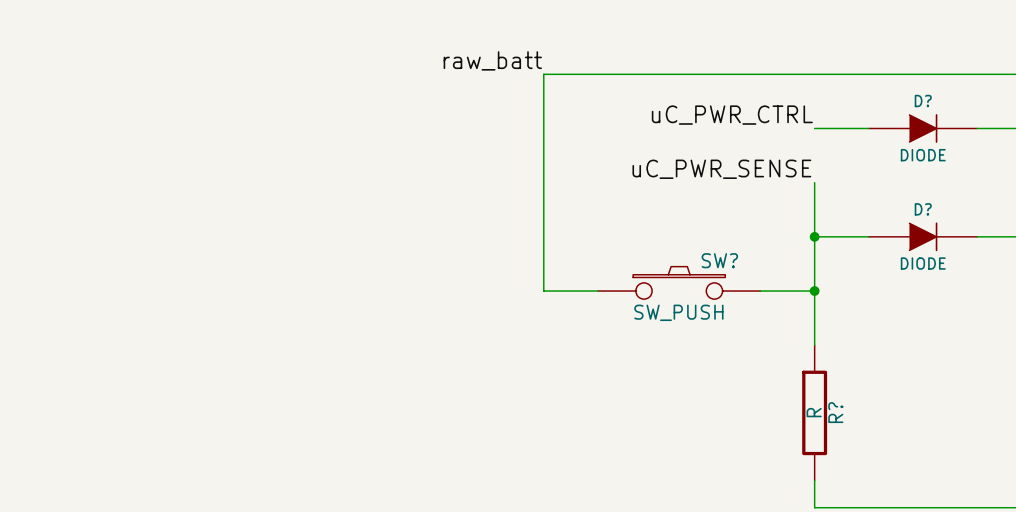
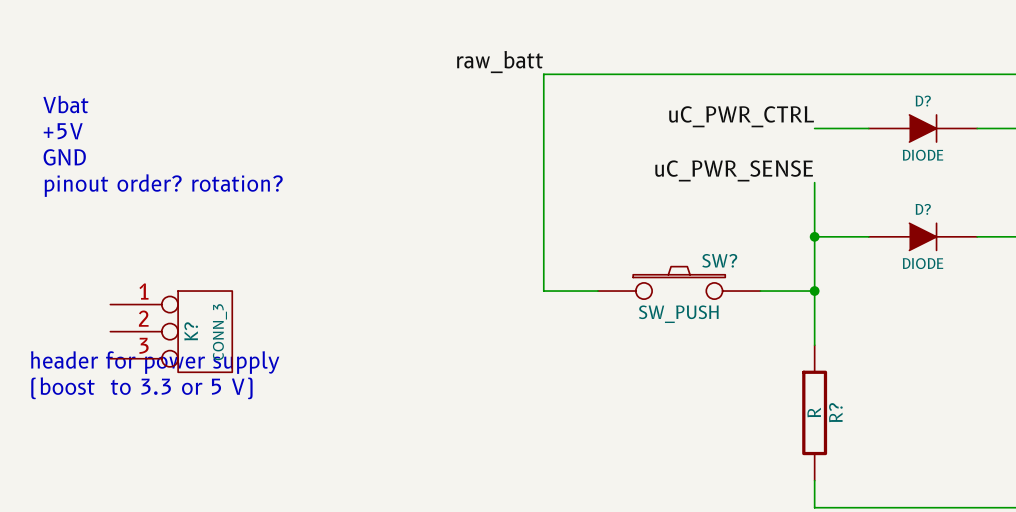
text: none -> Vbat (65, 104)
text: none -> +5V (63, 131)
text: none -> GND (64, 157)
text: none -> pinout order? rotation? (163, 185)
K?: none -> CONN_3 (171, 331)
text: none -> header for power supply (155, 362)
text: none -> (boost to 3.3 or 5 V) (141, 388)

